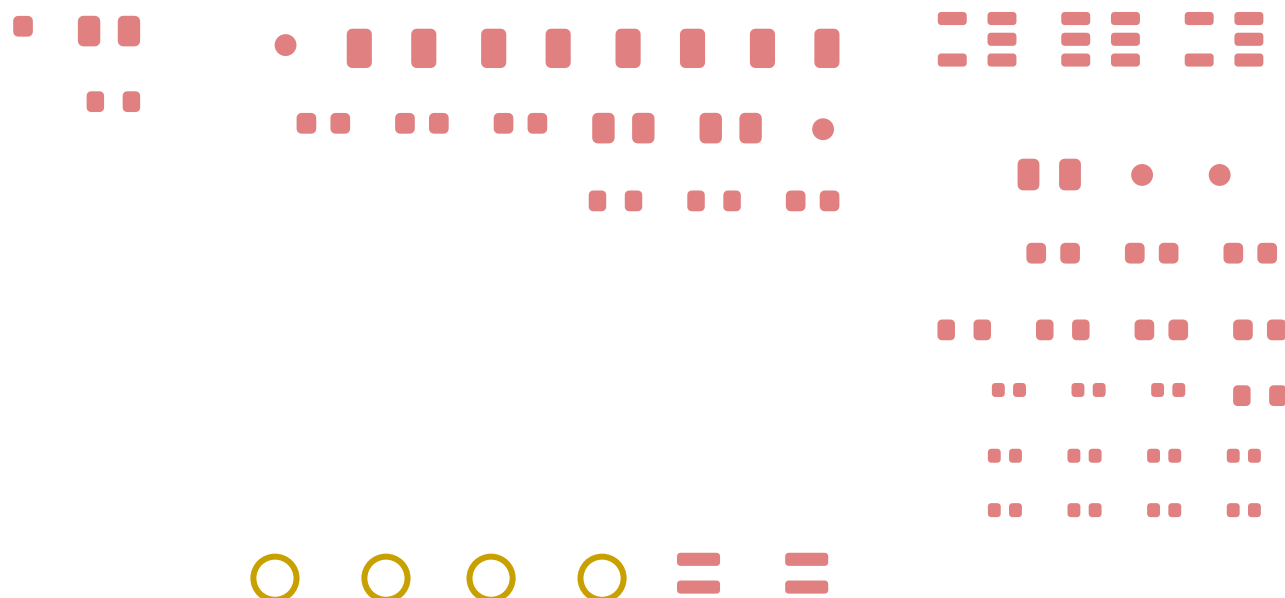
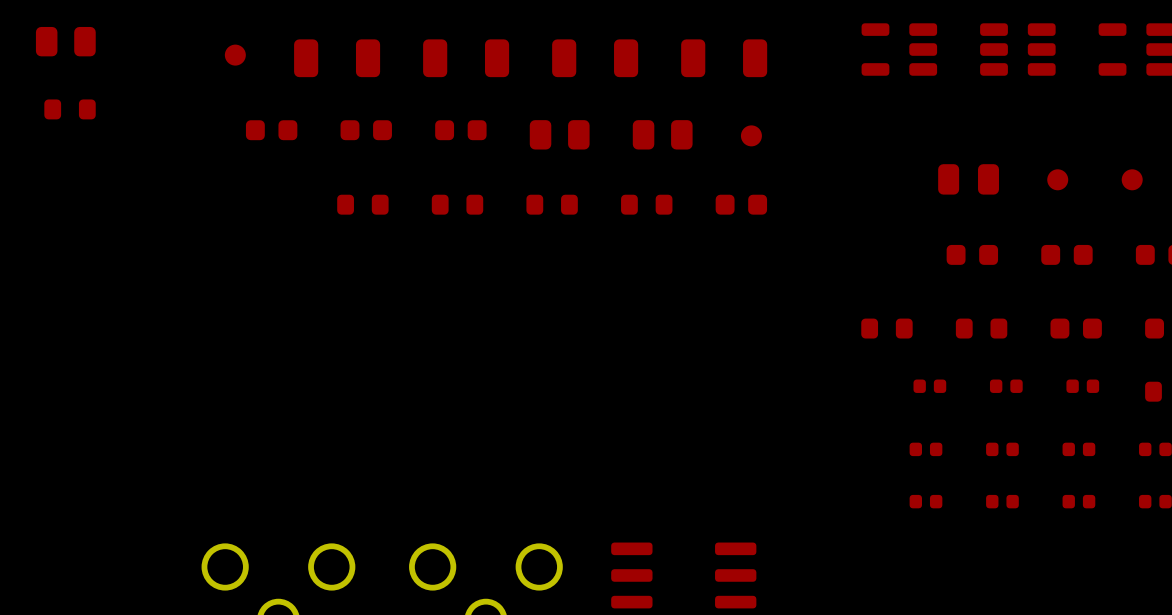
part: none -> (362, 204)
part: none -> (457, 204)

